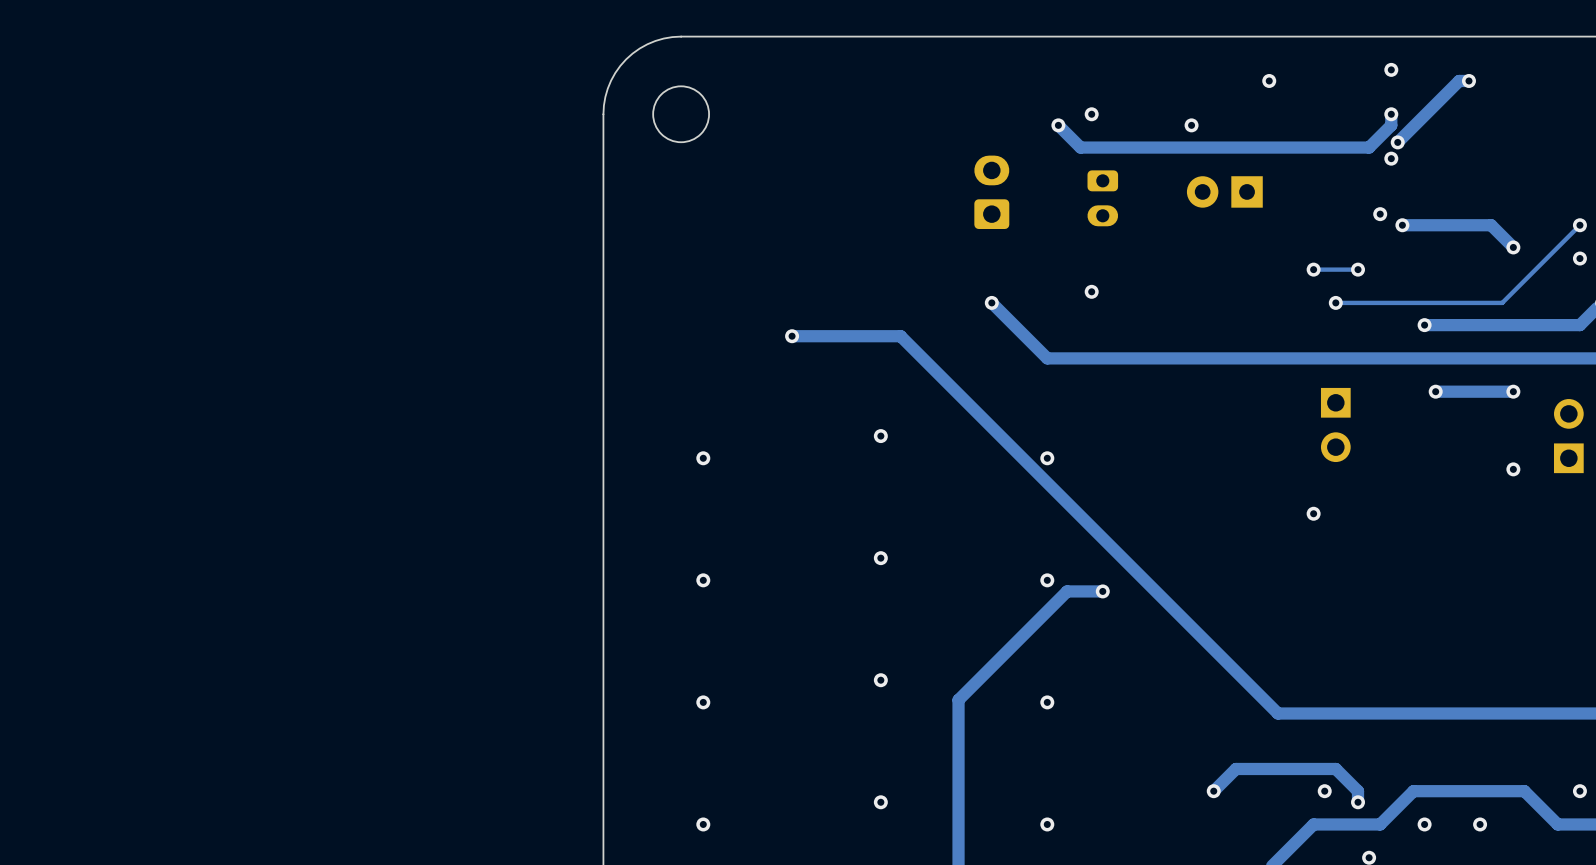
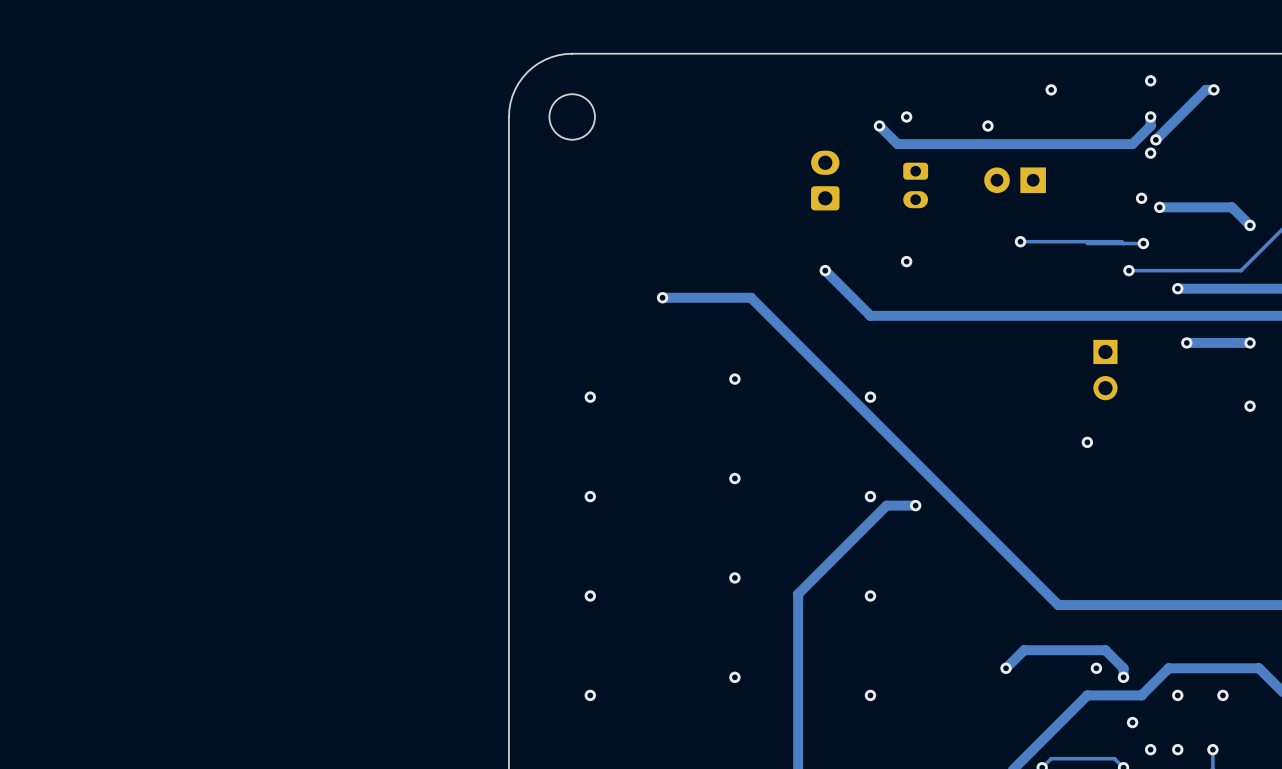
track: none -> (1020, 241) (1143, 243)
via: none -> (1020, 241)
via: (1313, 269) -> none
via: (1358, 269) -> none
via: none -> (1143, 243)
via: (1335, 302) -> none
track: (1364, 302) (1335, 302) -> none
via: none -> (1128, 270)

